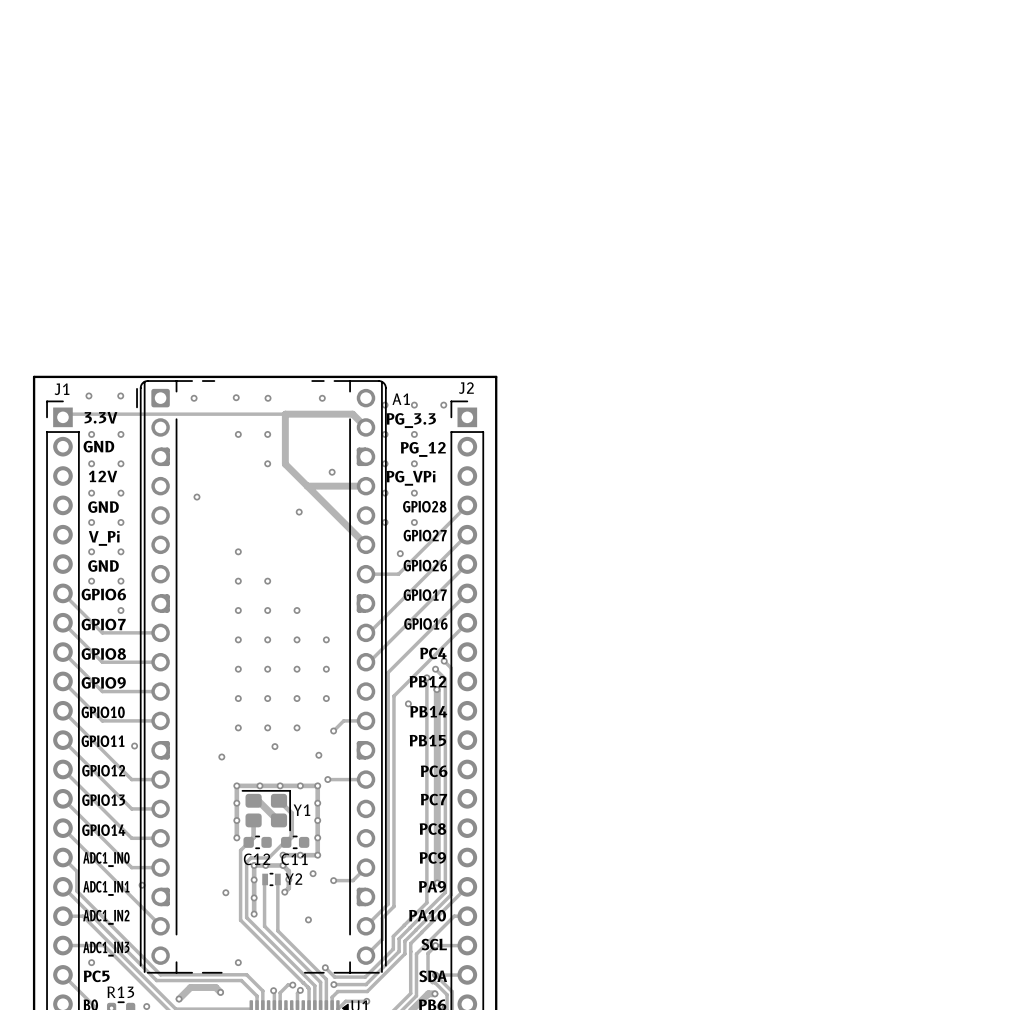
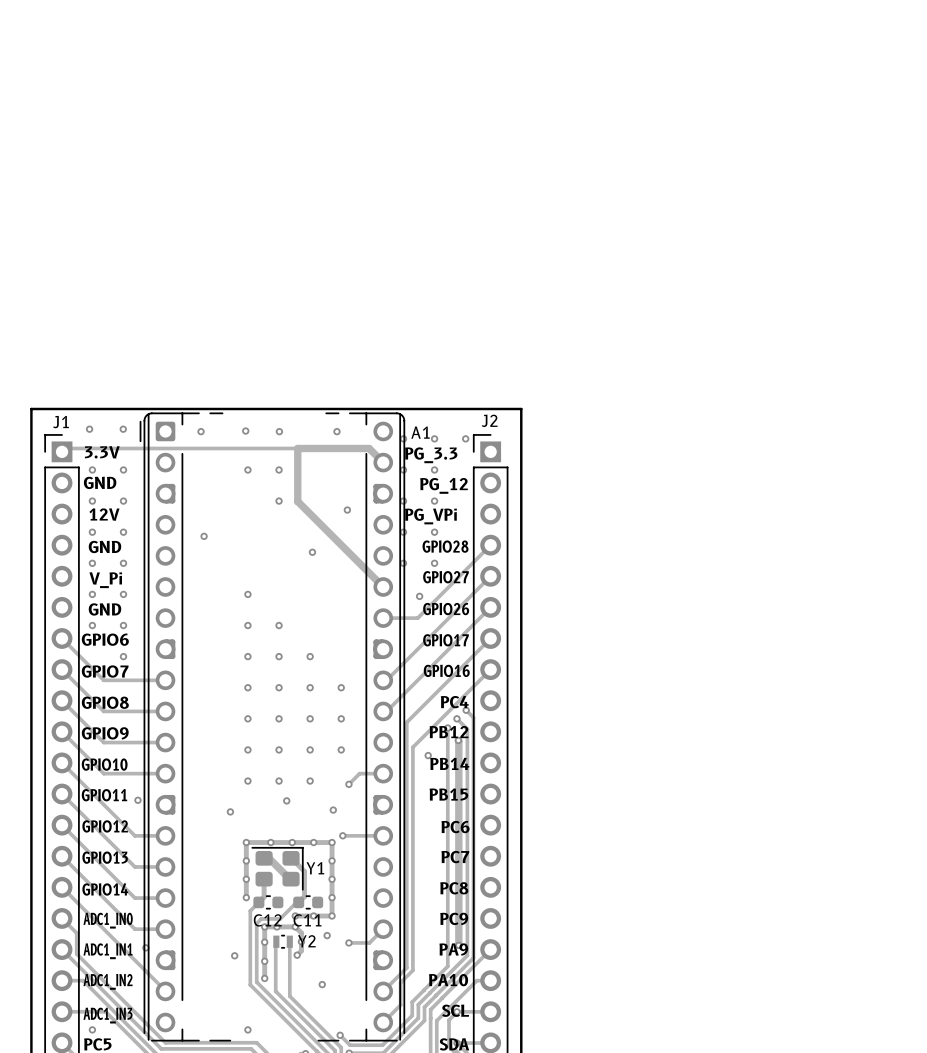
track: (307, 486) (365, 486) -> none

